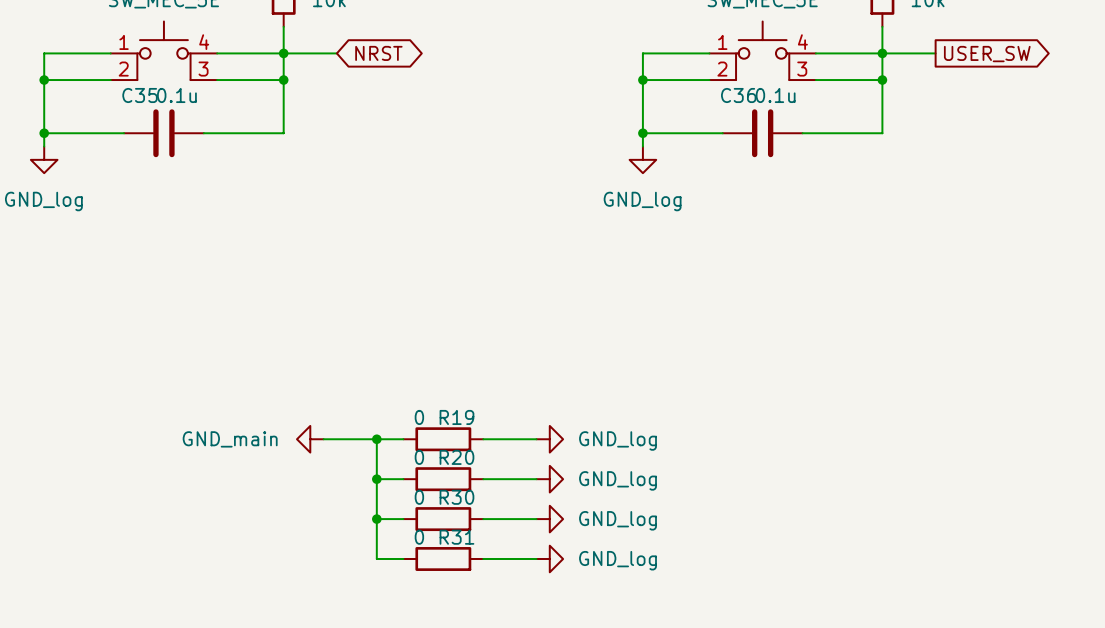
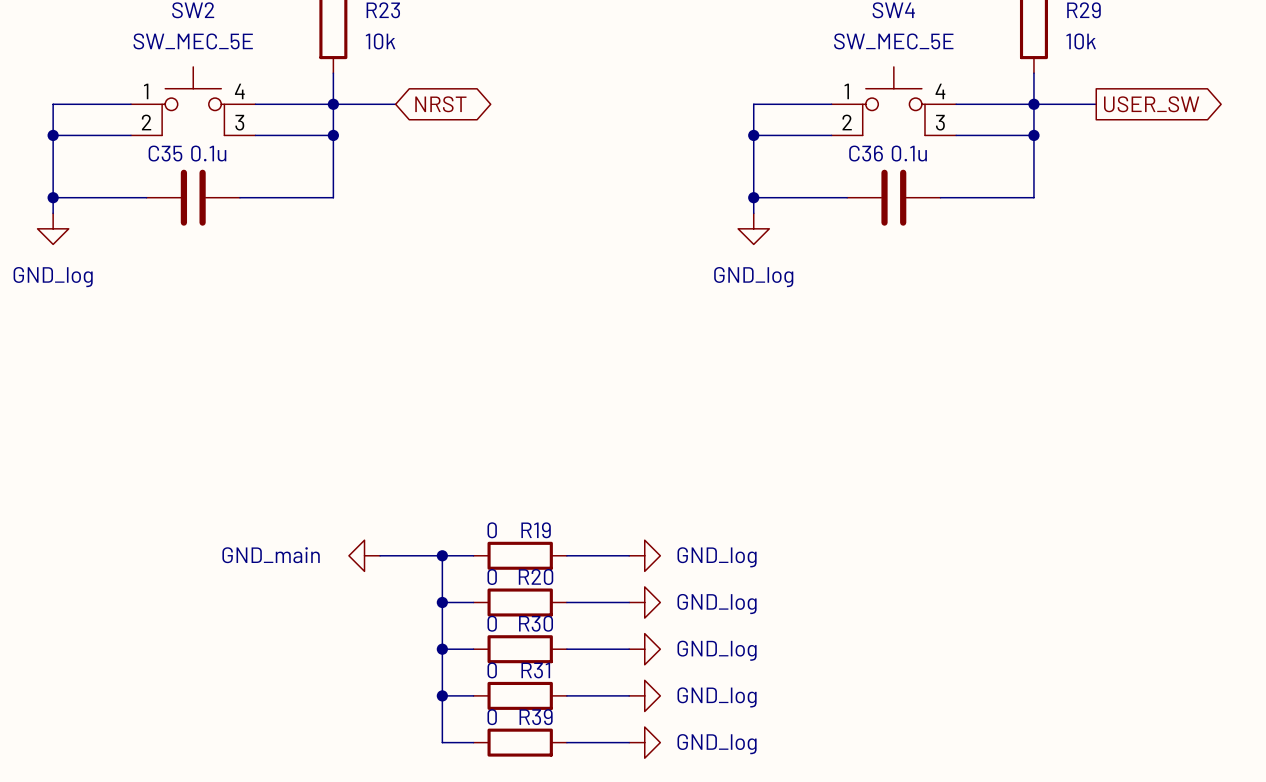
wire: none -> (442, 695) (442, 742) (473, 742)
junction: none -> (442, 695)
R39: none -> 0 (520, 742)
wire: none -> (566, 742) (629, 742)
power symbol: none -> GND_log (644, 742)

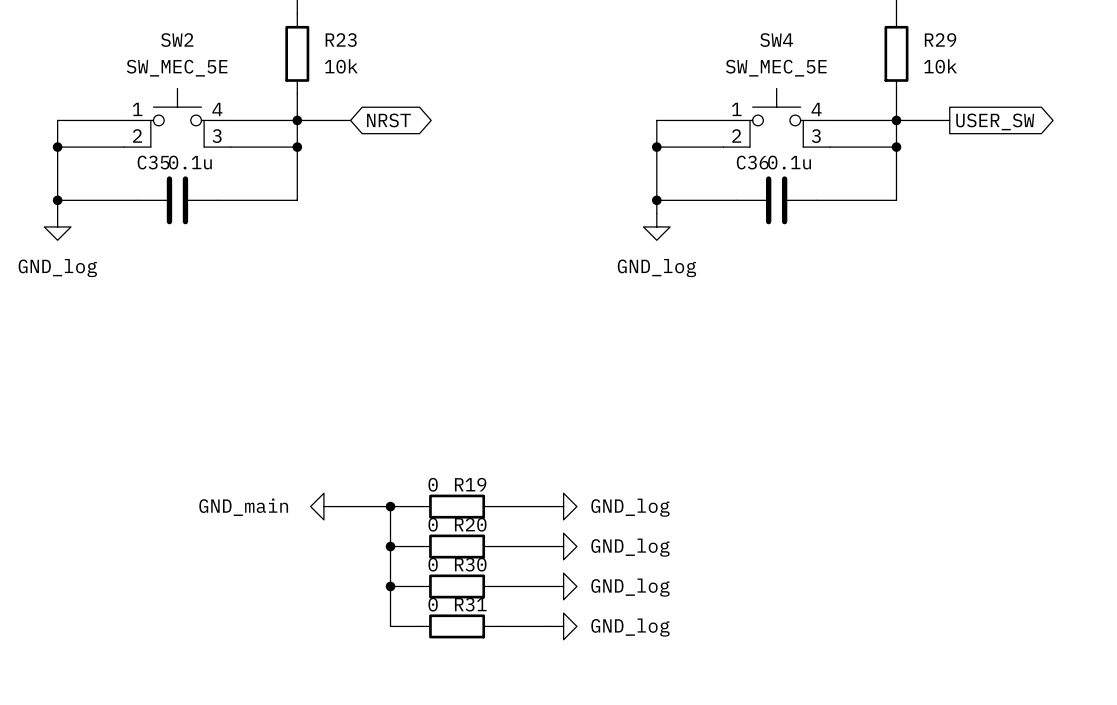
wire: (442, 695) (442, 742) (473, 742) -> none
junction: (442, 695) -> none
R39: 0 (520, 742) -> none
wire: (566, 742) (629, 742) -> none
power symbol: GND_log (644, 742) -> none

